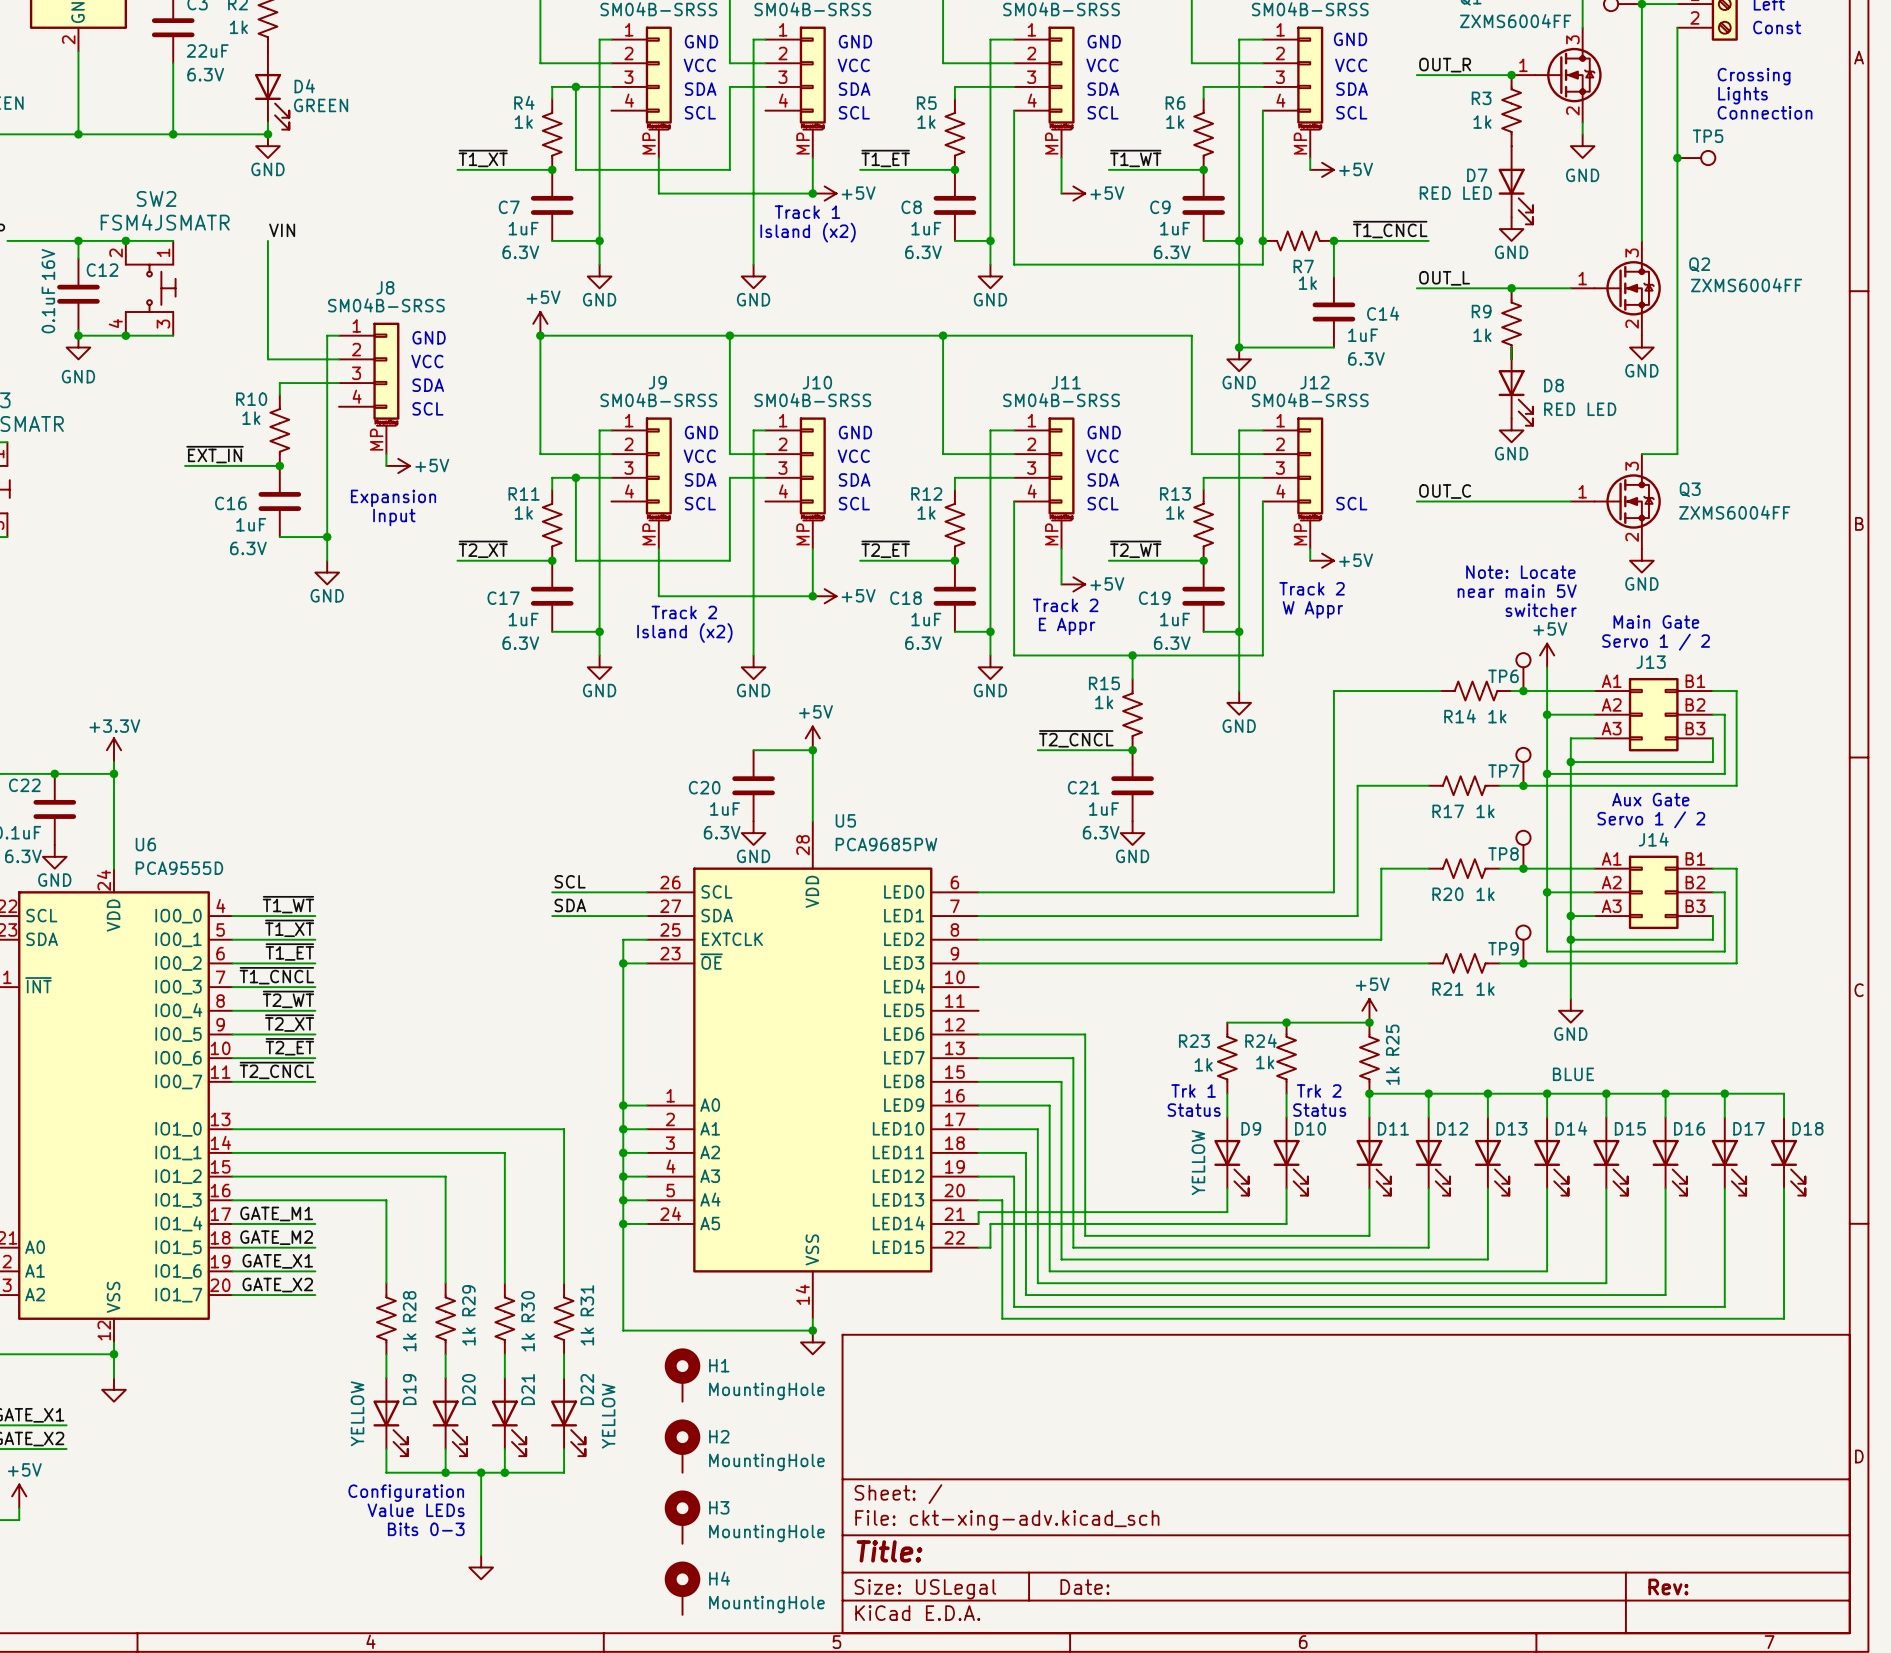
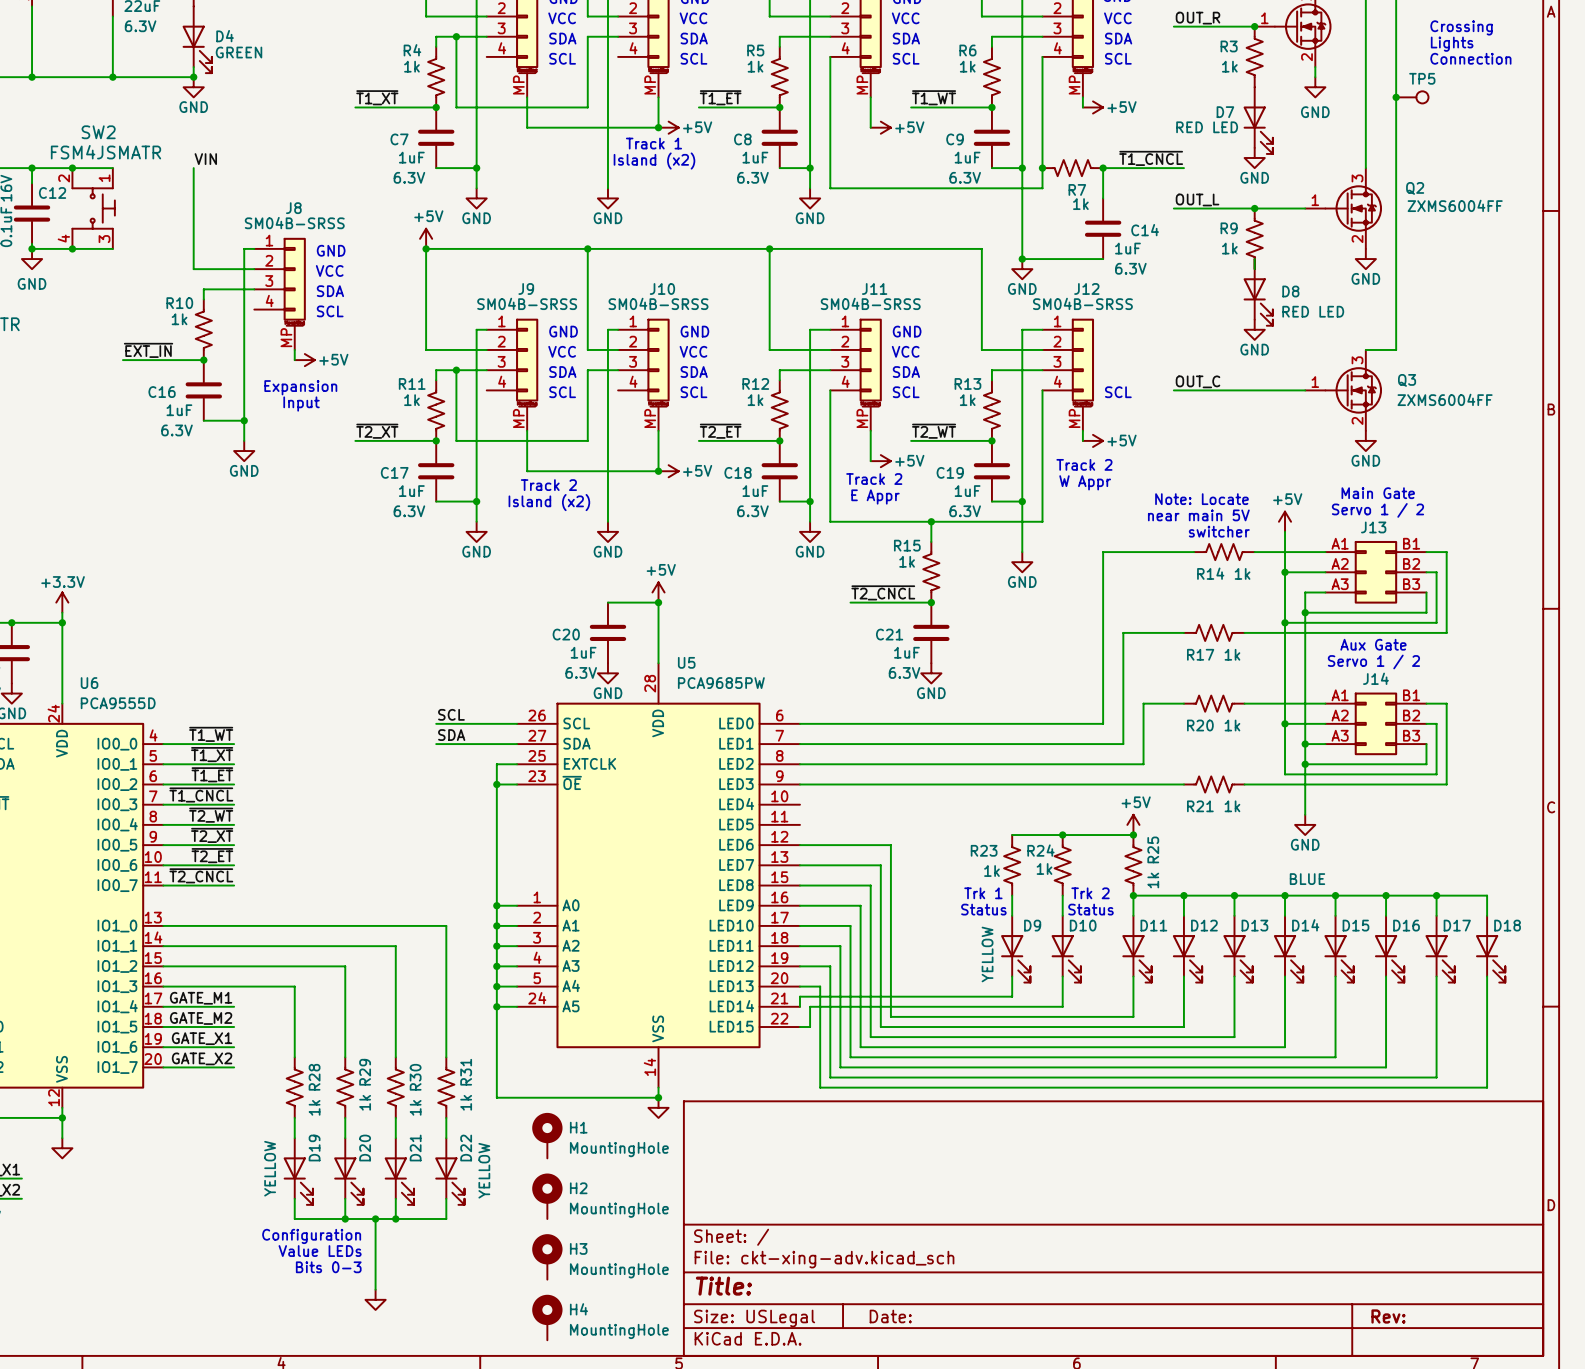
text position: Note: Locate (1520, 572) -> Note: Locate (1201, 499)
text position: near main 5V (1517, 591) -> near main 5V (1198, 515)
text position: switcher (1541, 610) -> switcher (1219, 531)
TP6: (1523, 672) -> none
junction: (1523, 691) -> none
TP7: (1523, 766) -> none
junction: (1523, 785) -> none
TP8: (1523, 849) -> none
junction: (1523, 868) -> none
TP9: (1523, 944) -> none
junction: (1523, 963) -> none

